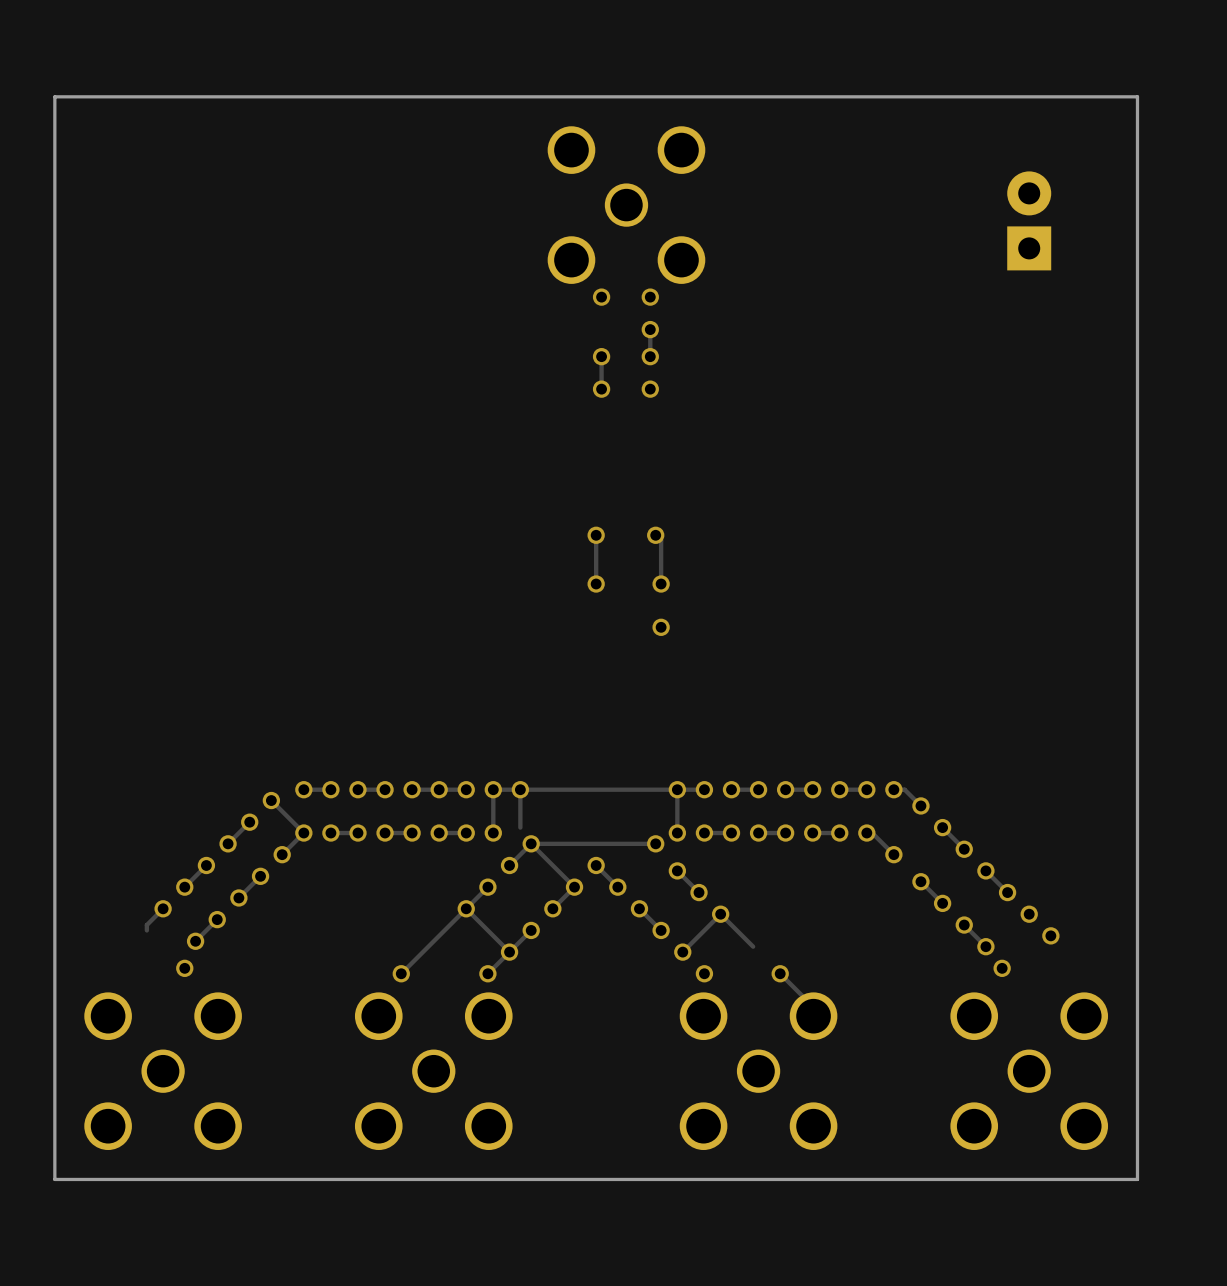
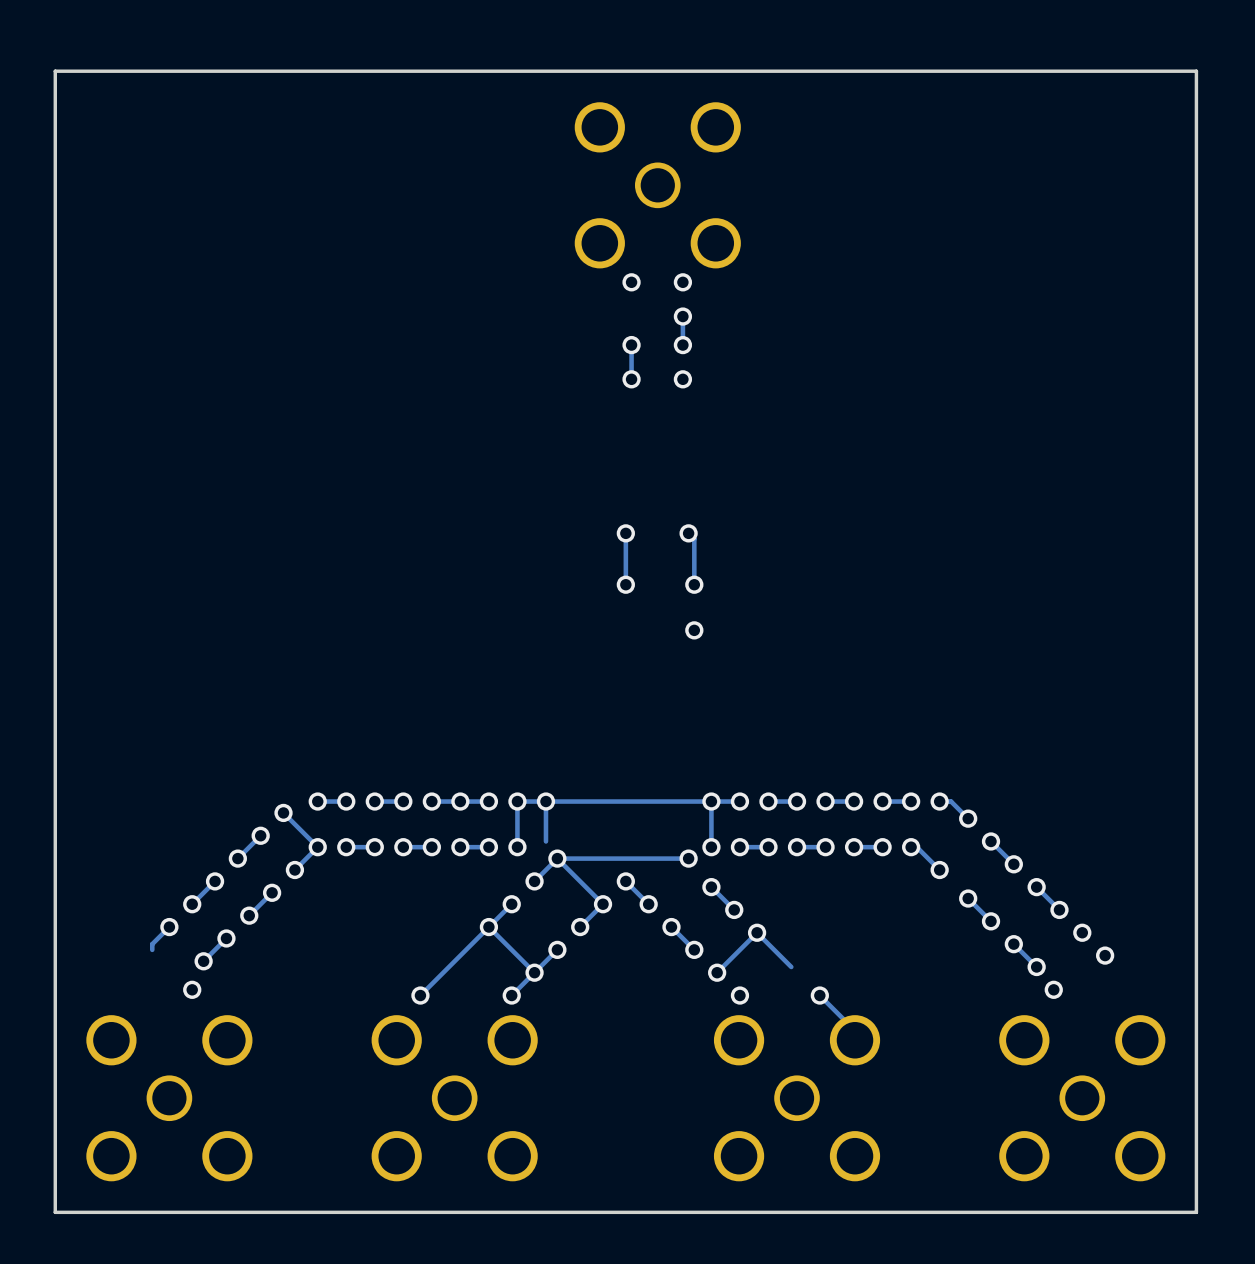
part: (1029, 220) -> none

